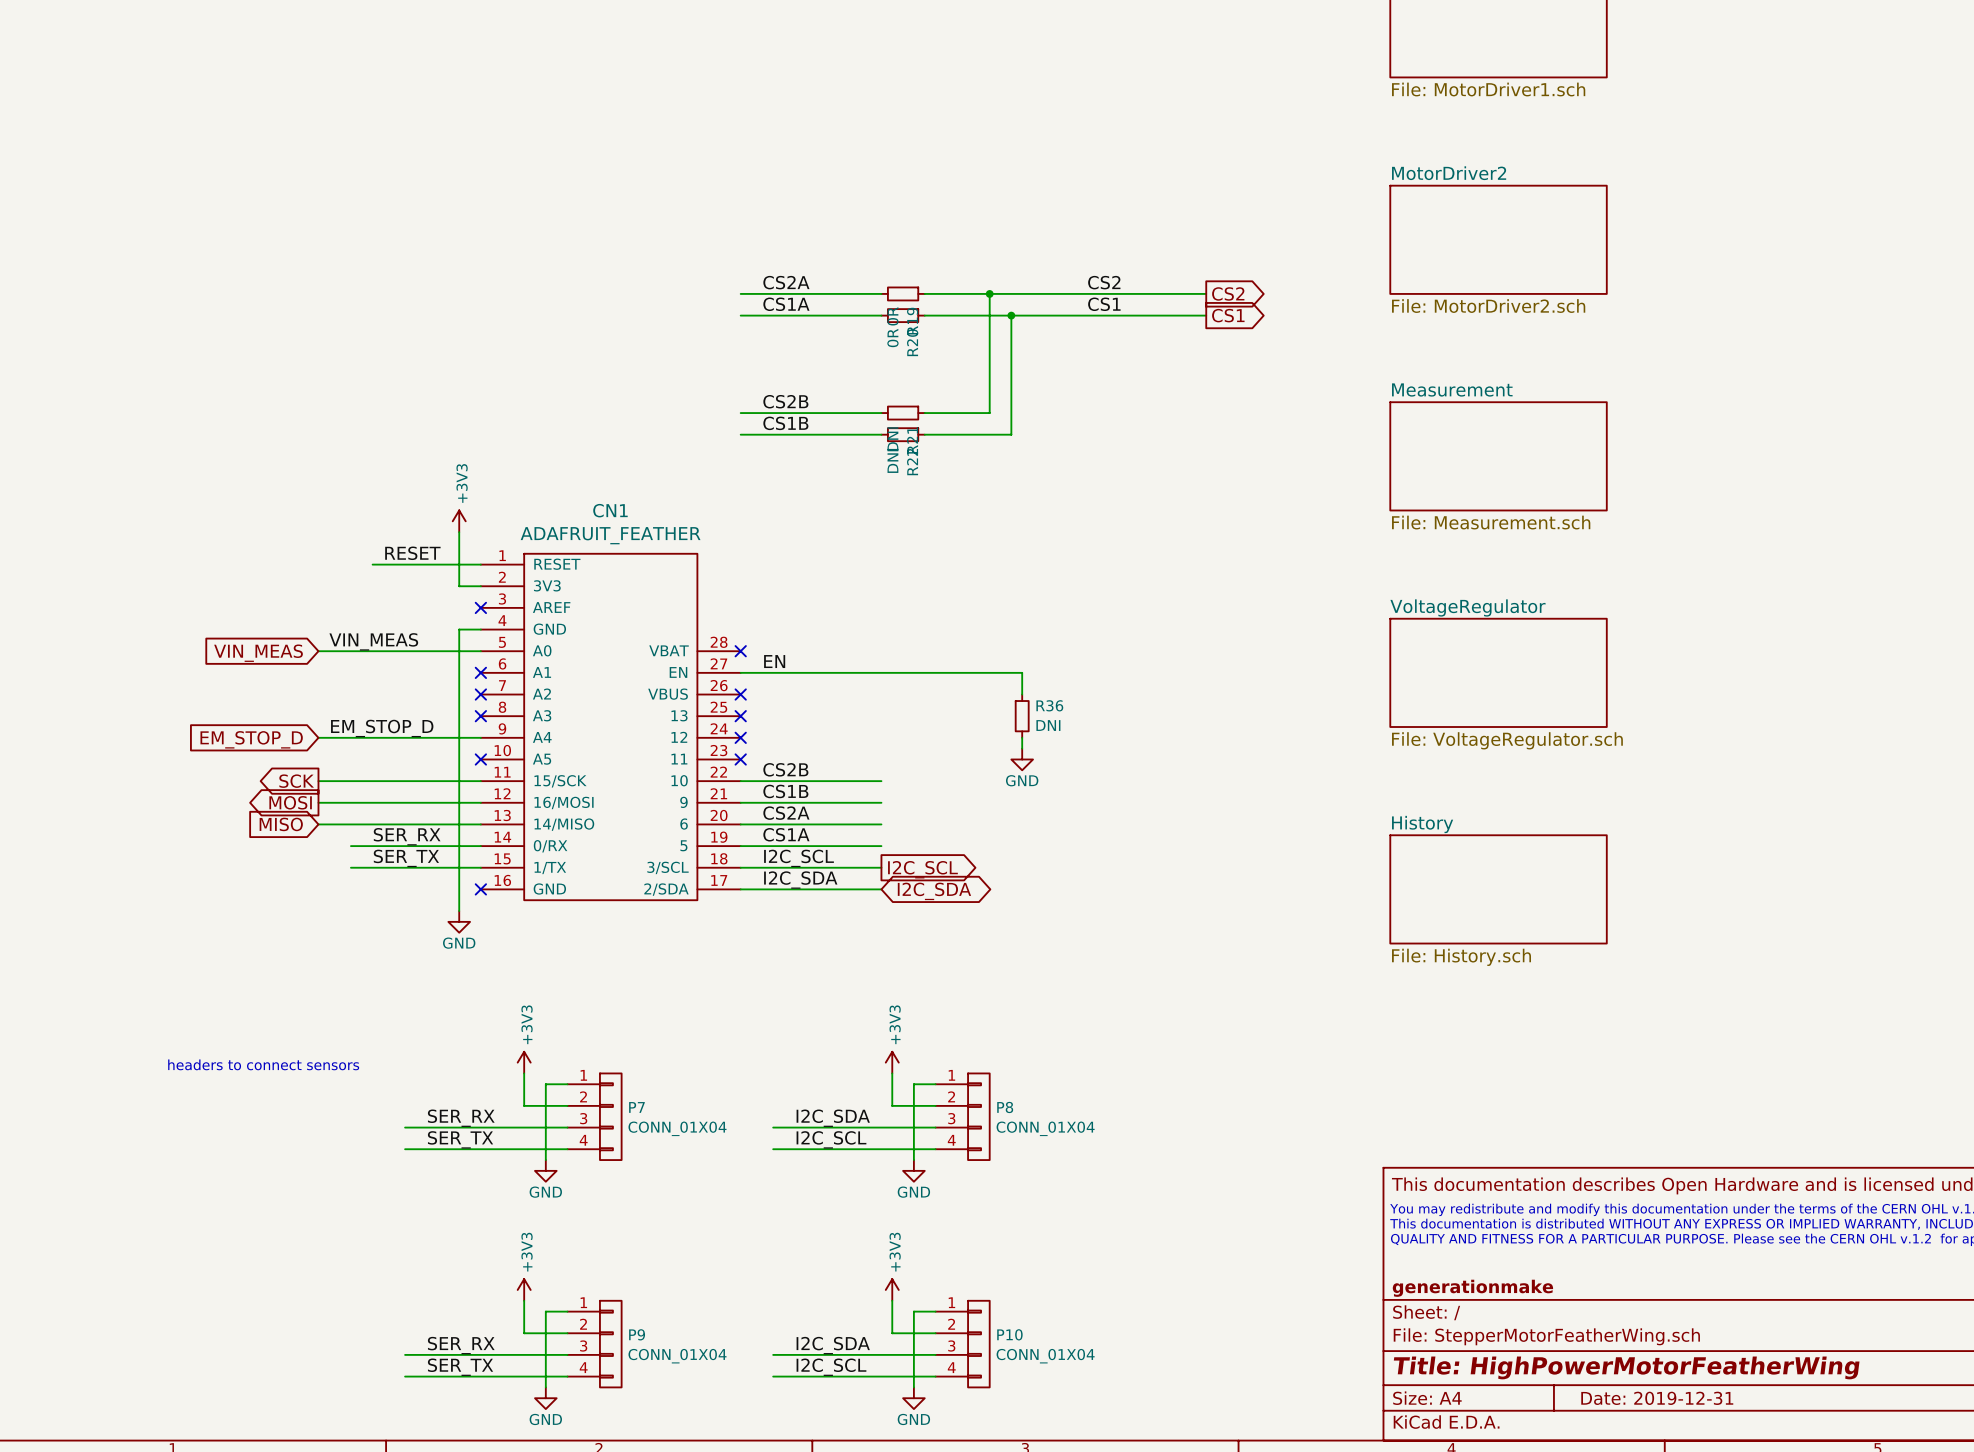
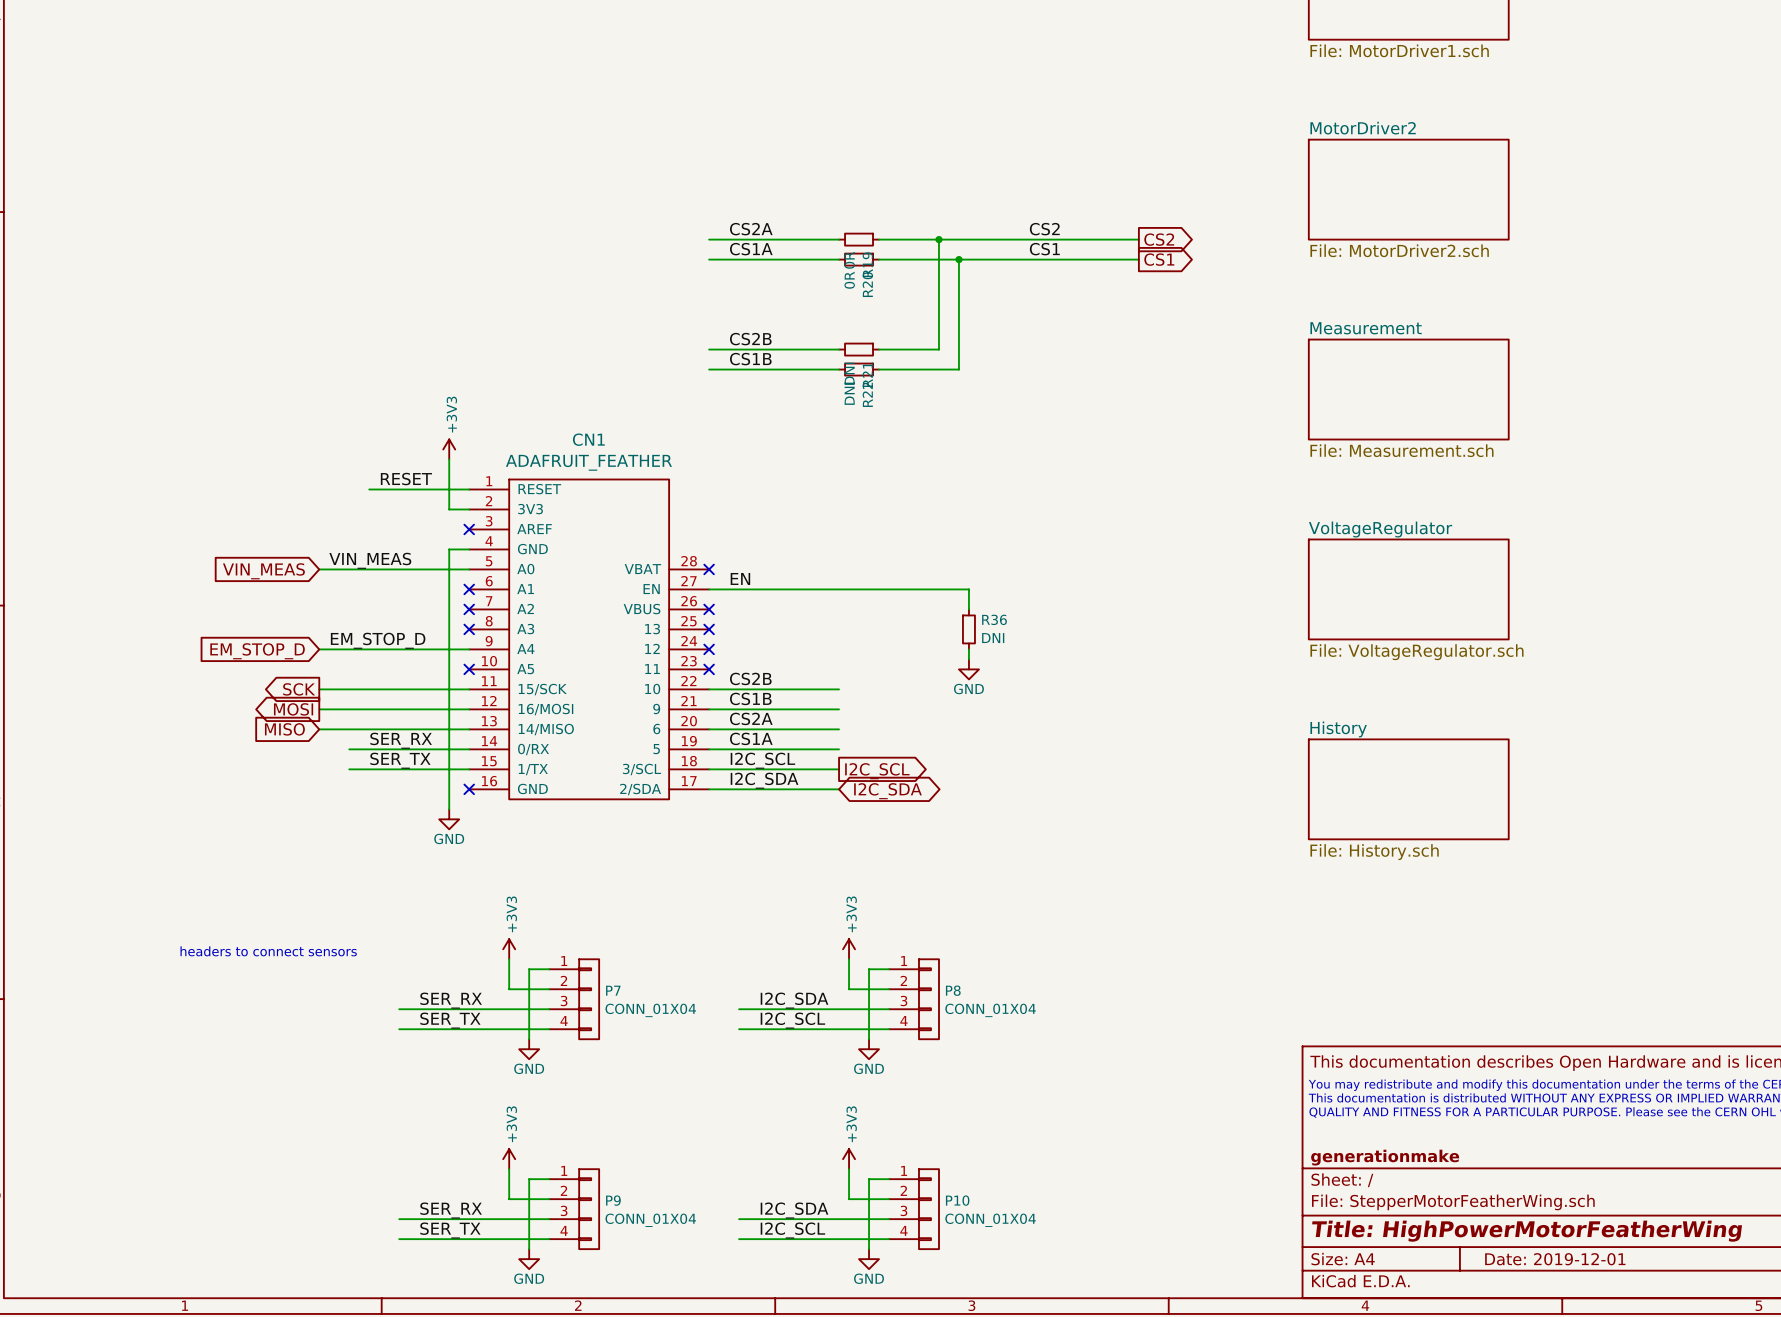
title block: Date: 2019-12-31 (1657, 1398) -> Date: 2019-12-01 (1555, 1259)

